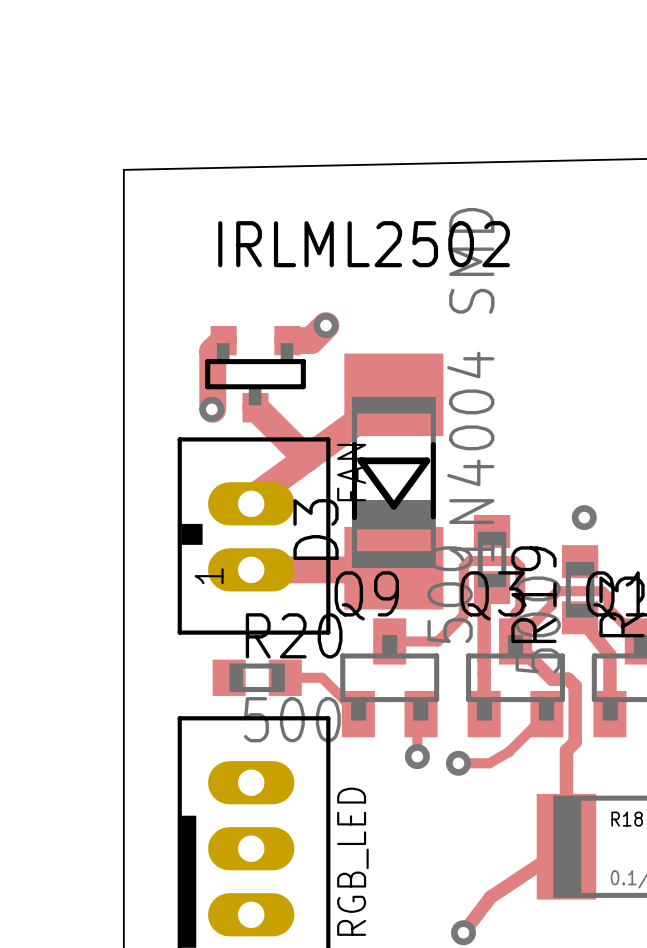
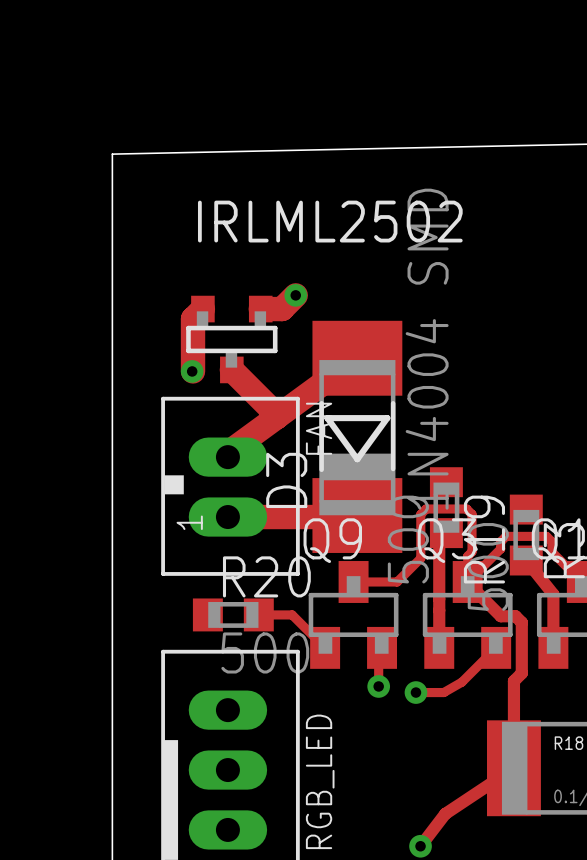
via: (584, 517) -> none

